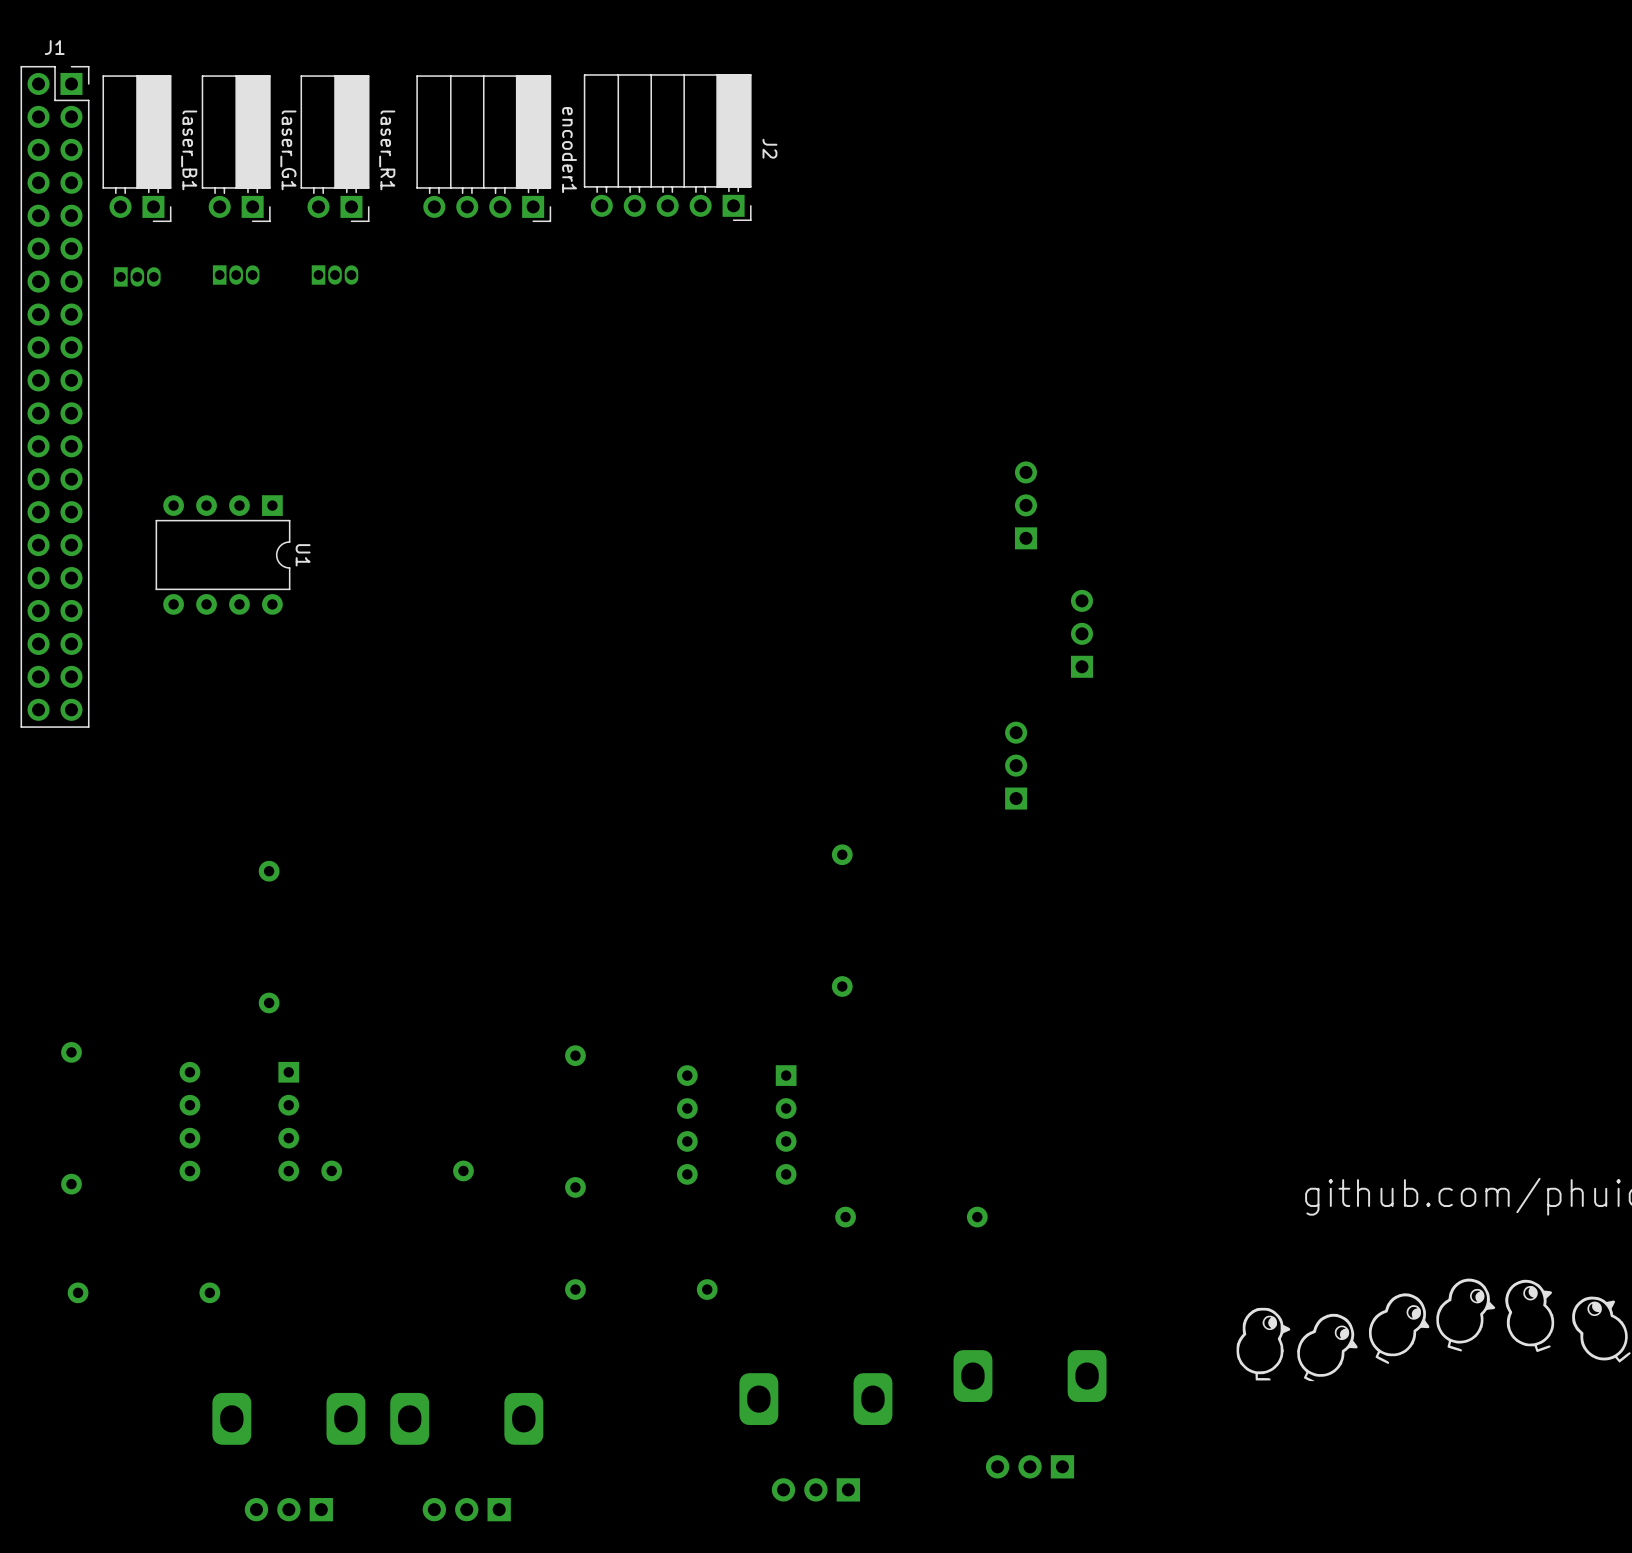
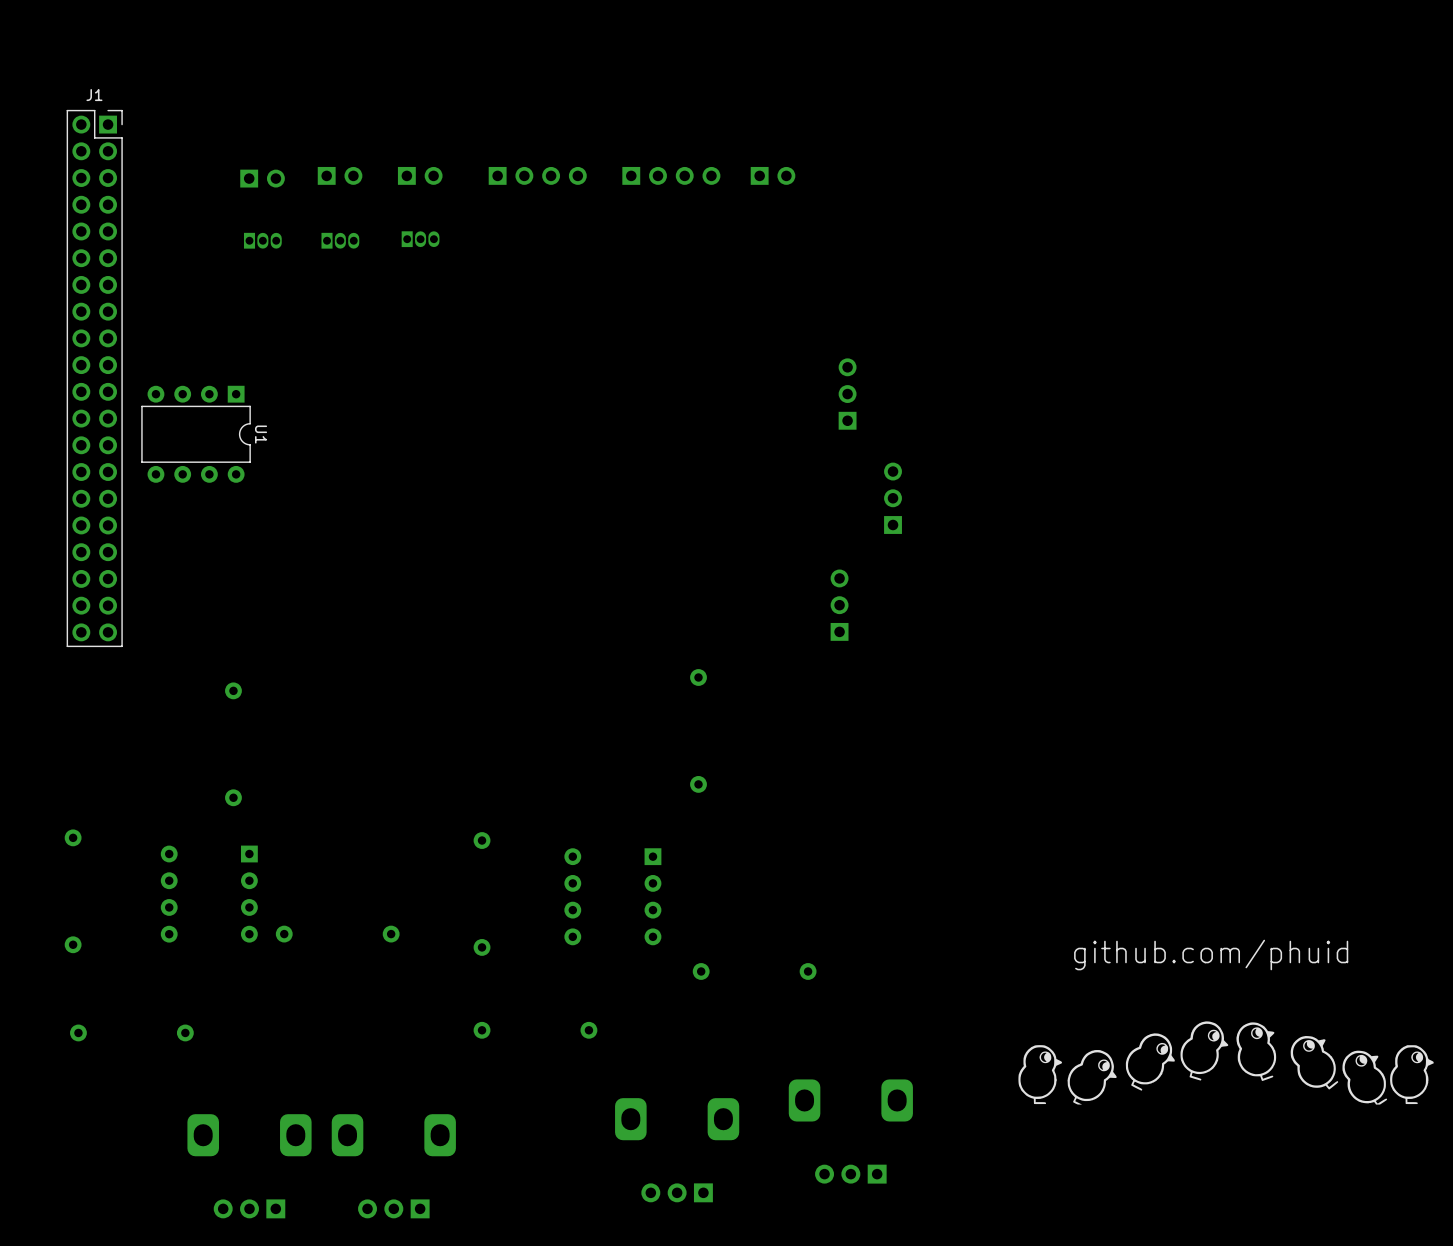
J2: (667, 147) -> none
laser_B1: (136, 148) -> none
laser_G1 side: bottom (236, 148) -> top (340, 175)
laser_R1 side: bottom (335, 148) -> top (262, 178)
encoder1 side: bottom (483, 148) -> top (537, 175)
part: none -> (420, 175)
part: none -> (671, 175)
part: none -> (773, 175)
part: (236, 275) -> none
part: (335, 275) -> none
part: (137, 276) -> none
part: none -> (420, 239)
part: none -> (262, 240)
part: none -> (340, 240)
J1 position: (55, 396) -> (94, 378)

